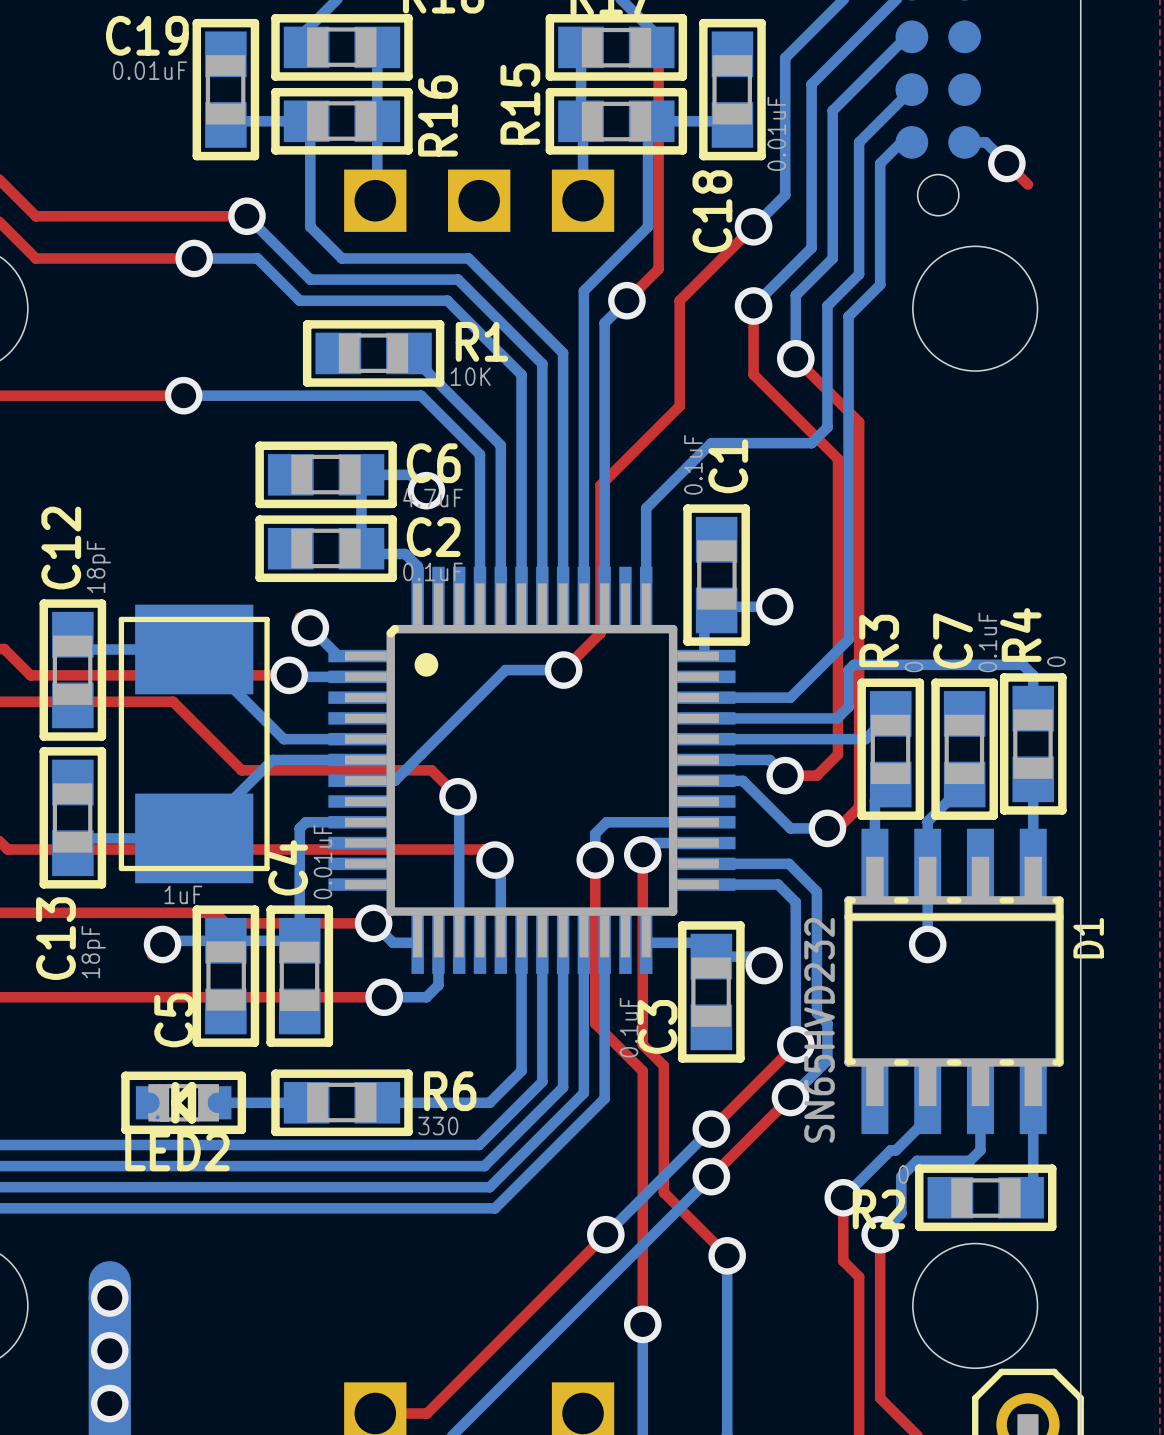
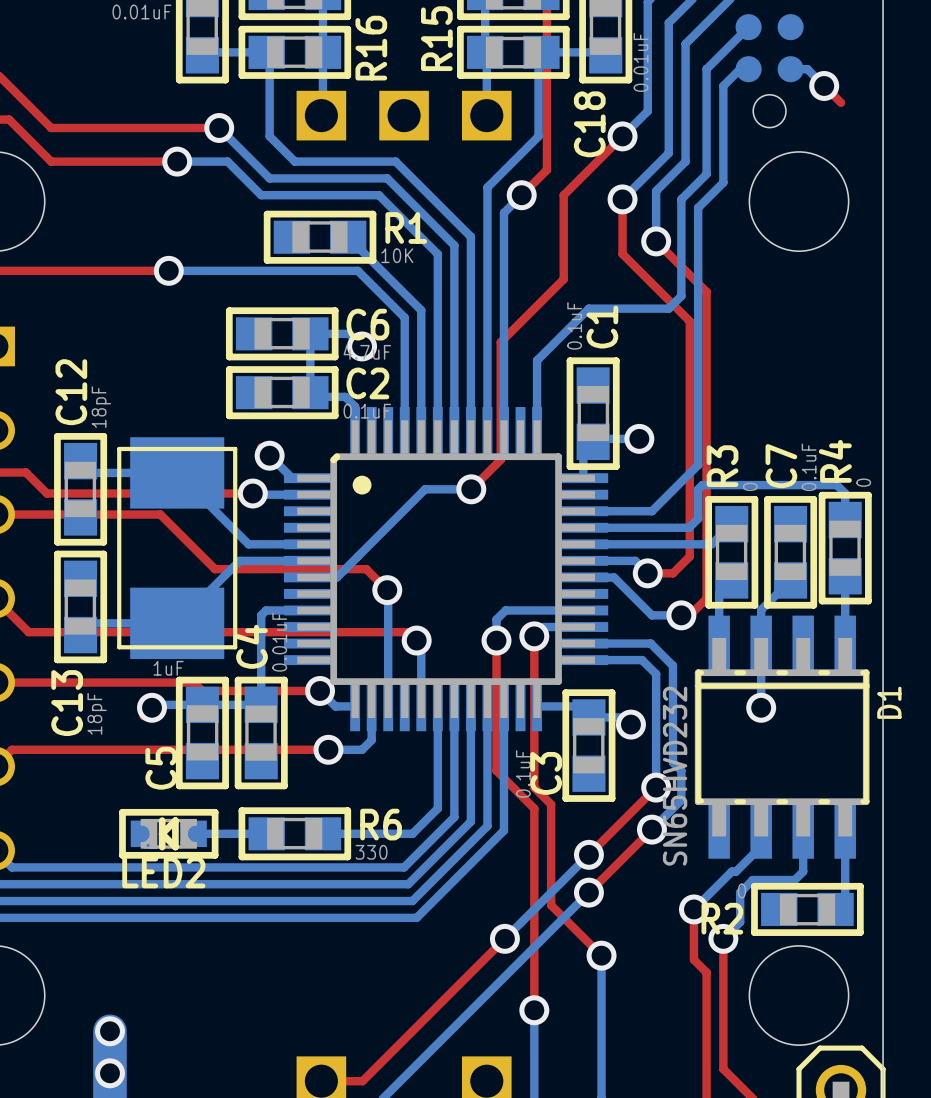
bottom track: (109, 1282) (109, 1350) -> none
via: (109, 1298) -> none

